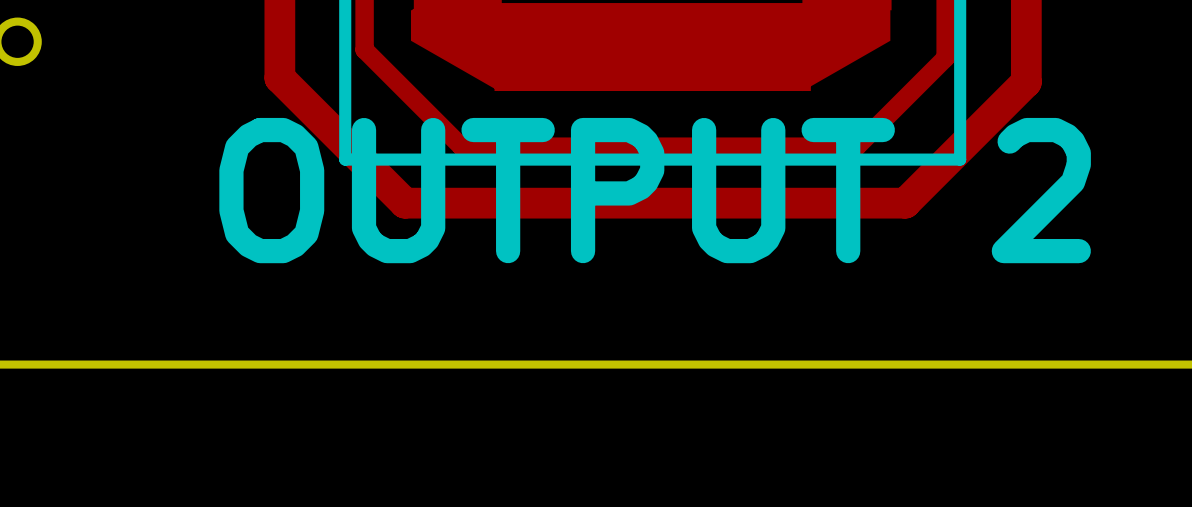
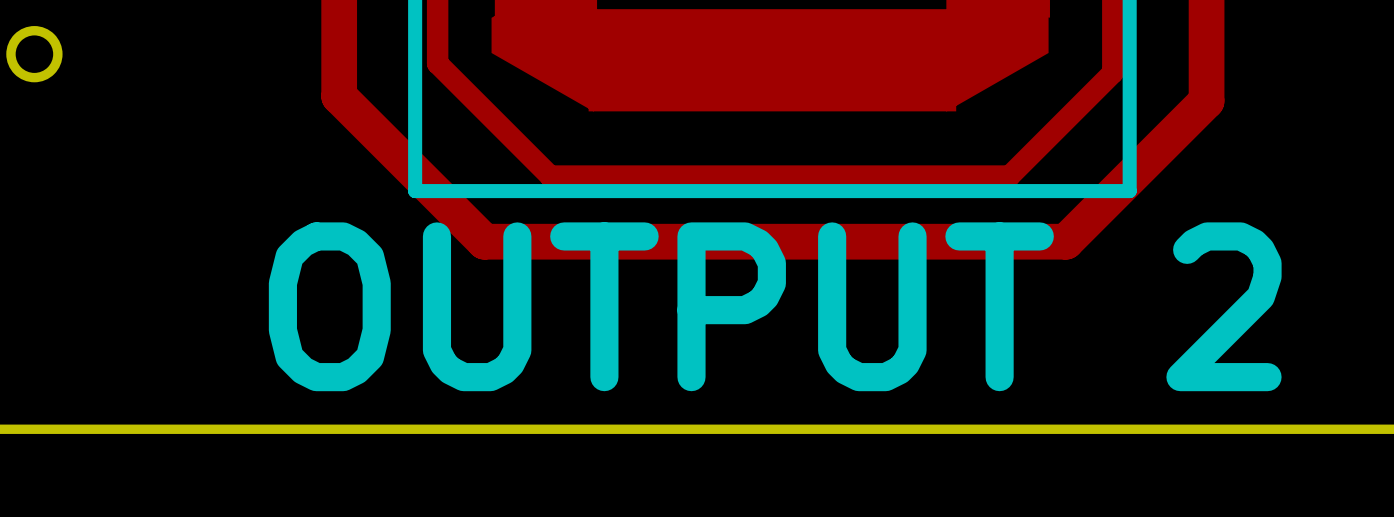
text position: OUTPUT 2 (655, 190) -> OUTPUT 2 (775, 306)

